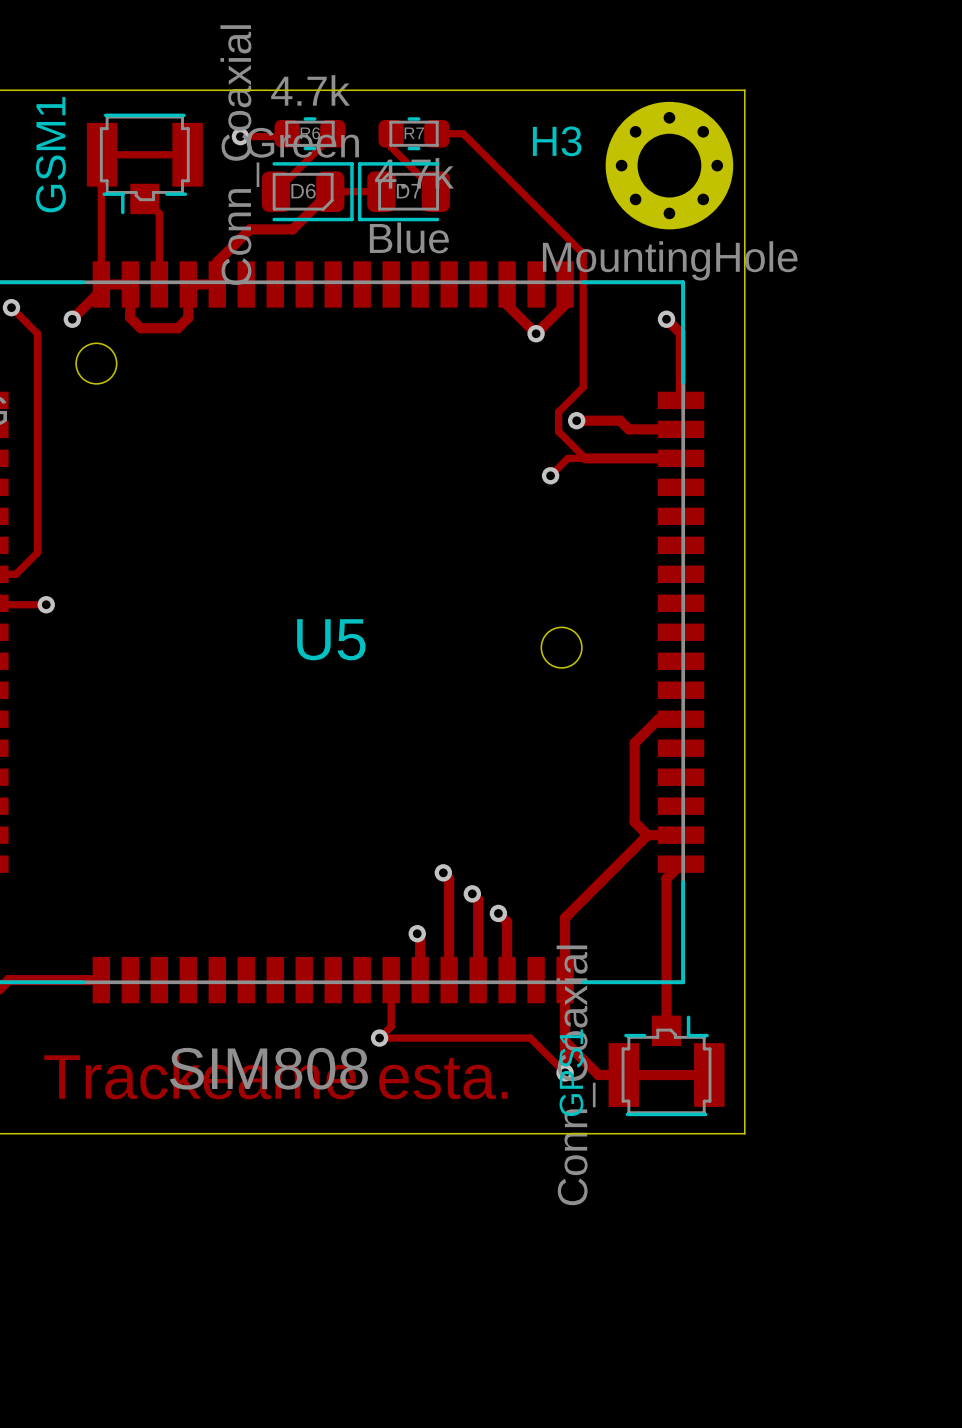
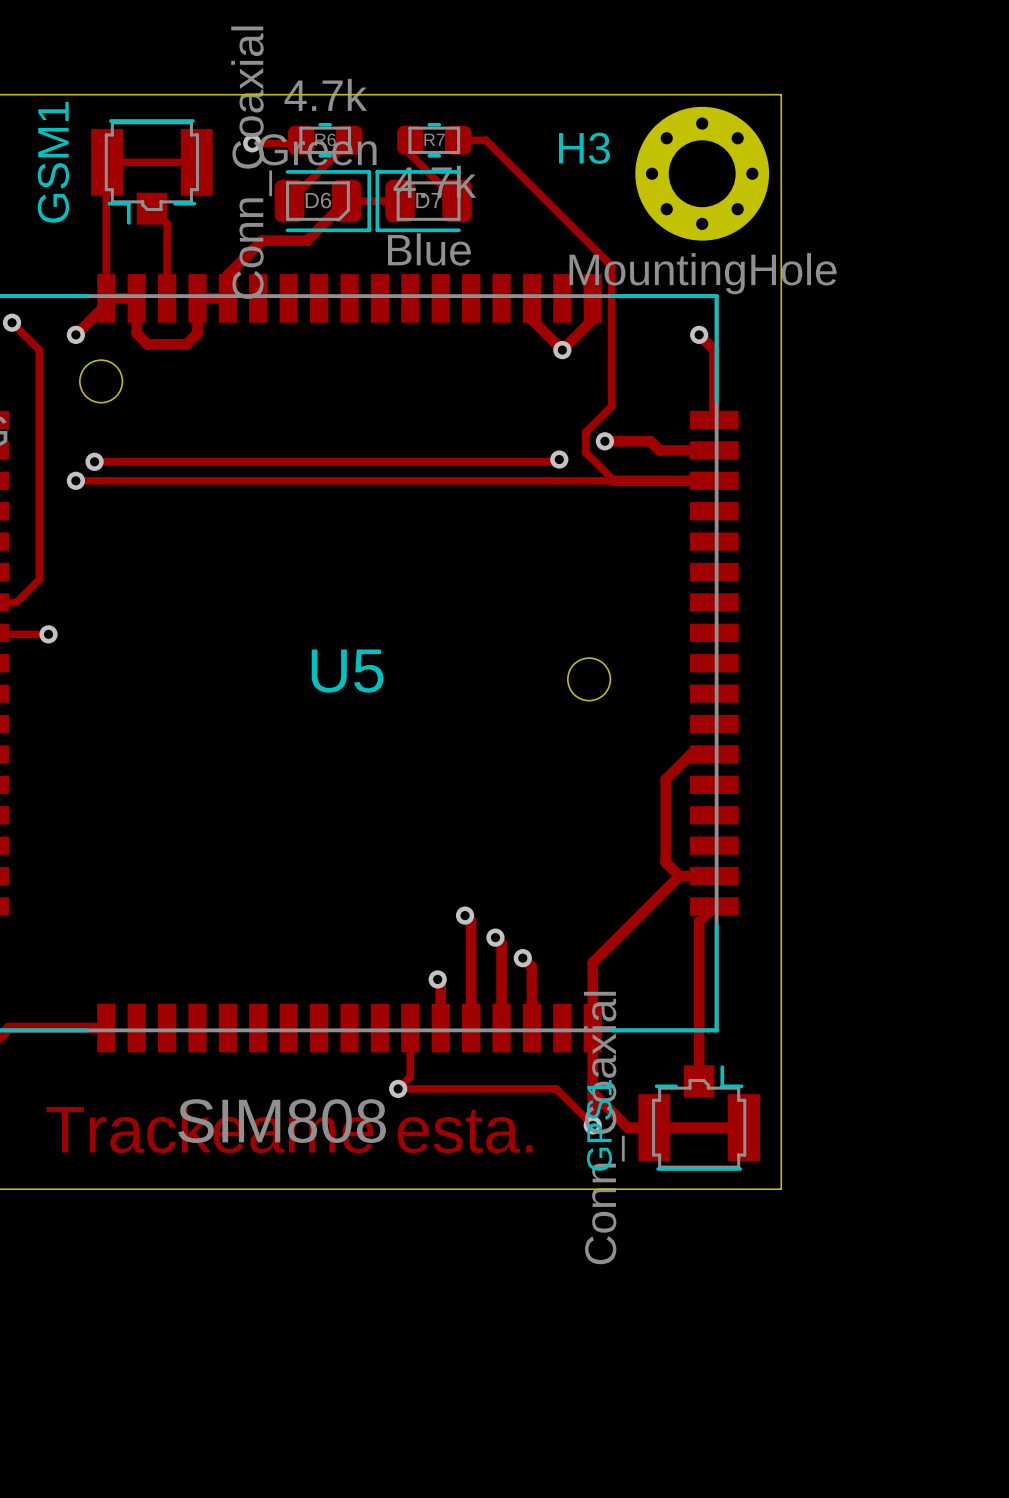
track: none -> (559, 459) (557, 461) (94, 461)
via: none -> (94, 461)
via: none -> (75, 480)
track: (567, 458) (550, 475) -> (595, 480) (75, 480)
via position: (550, 475) -> (559, 459)

